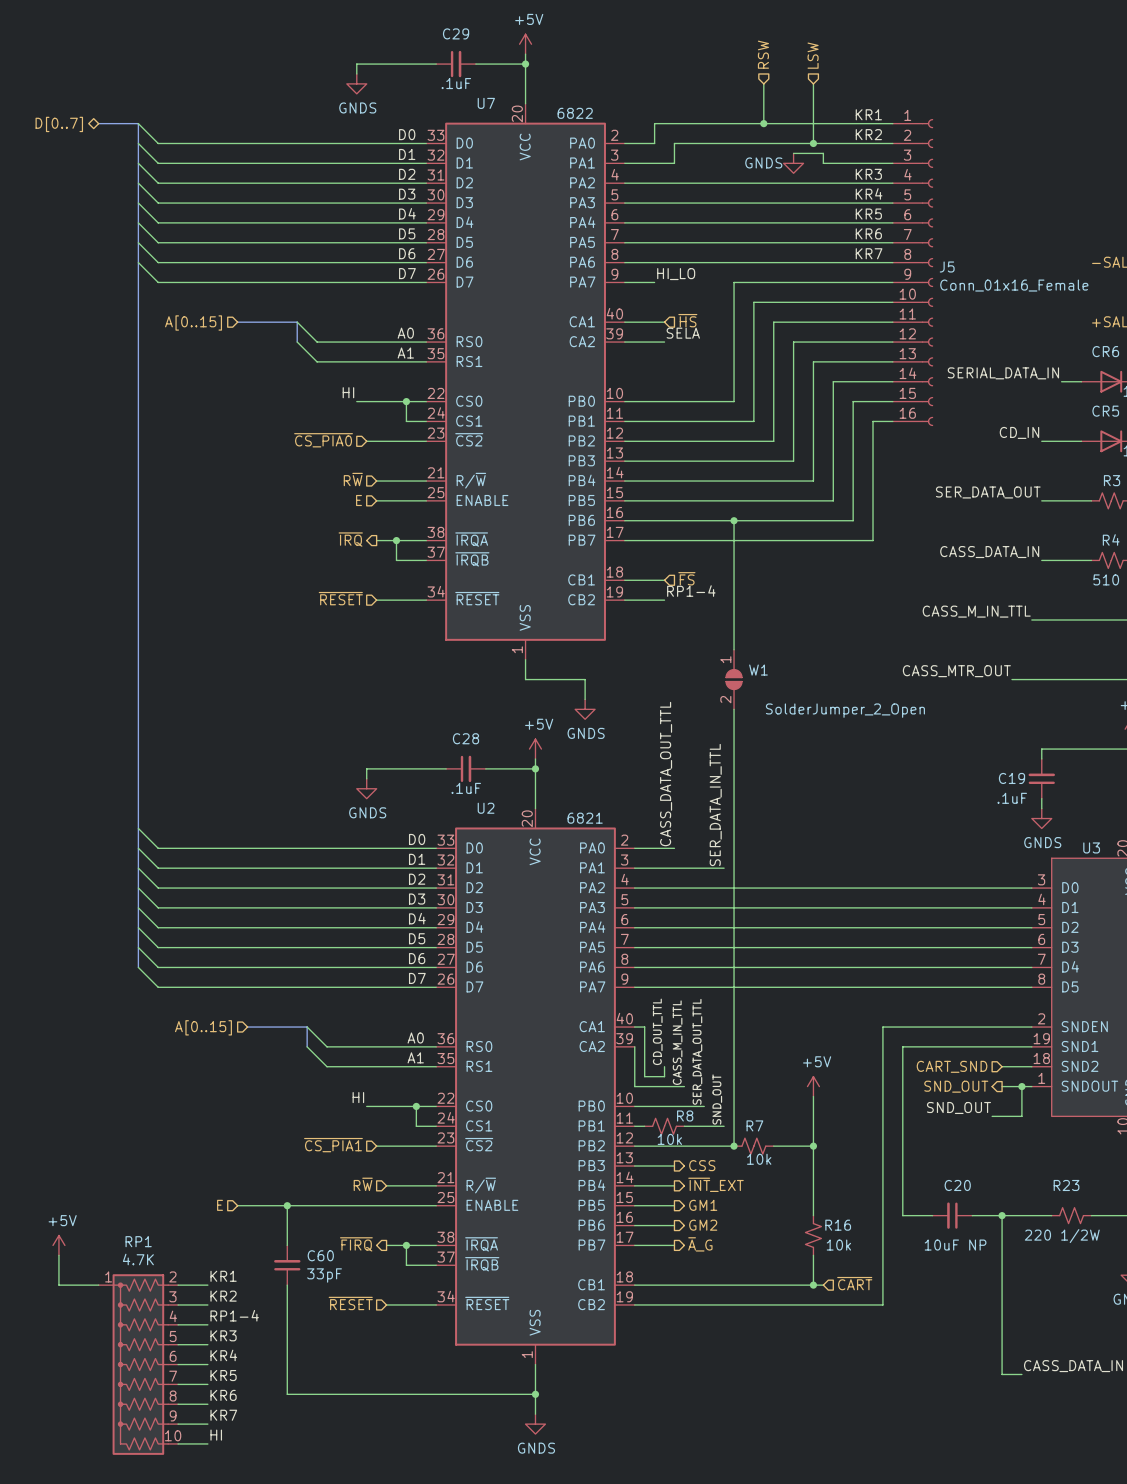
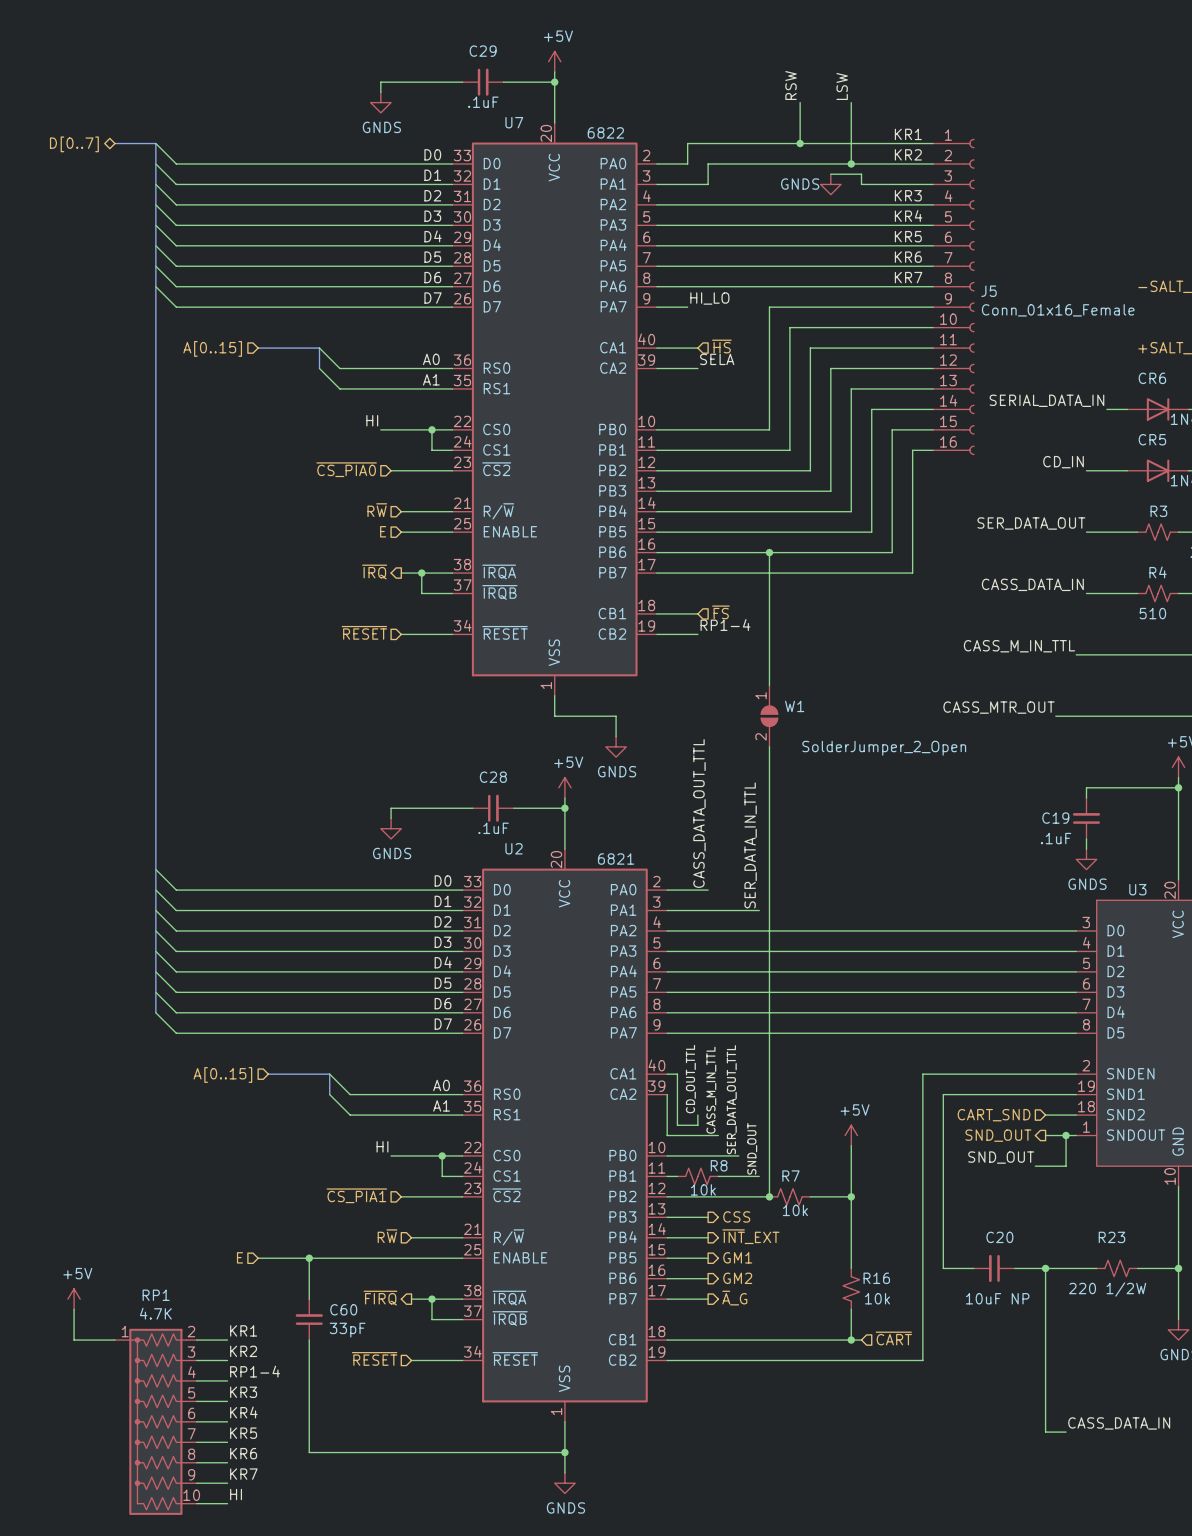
hierarchical label: RSW (763, 54) -> none
hierarchical label: LSW (813, 55) -> none
label: none -> RSW (791, 85)
label: none -> LSW (842, 86)

